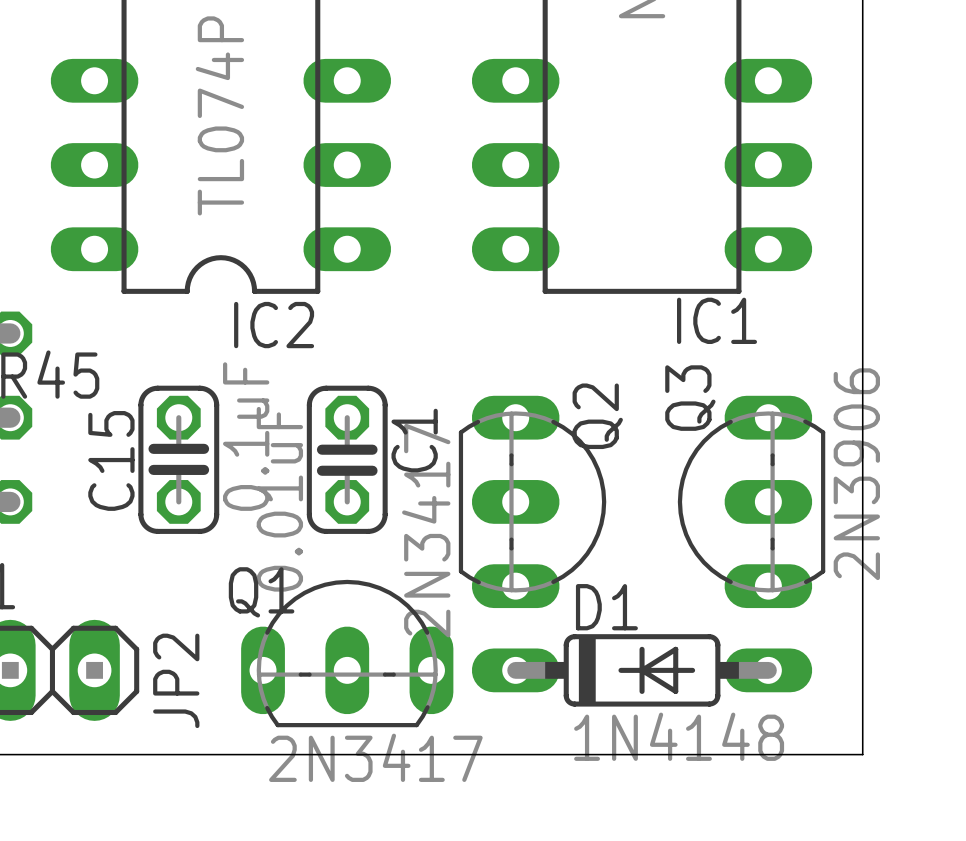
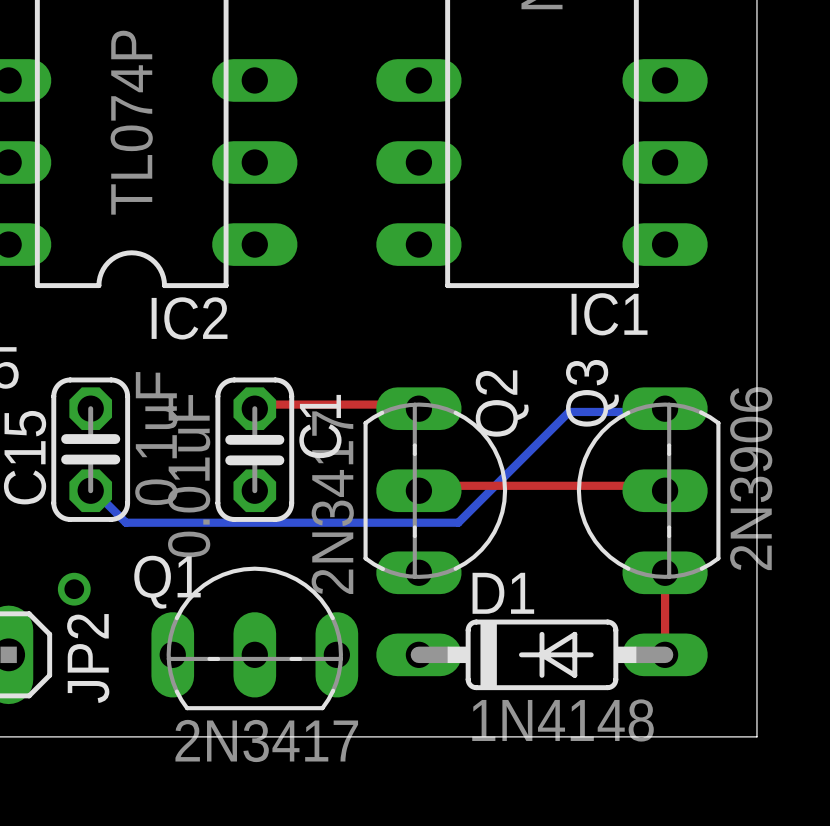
top track: none -> (254, 408) (258, 404) (413, 404) (418, 408)
bottom track: none -> (665, 408) (665, 411) (569, 411) (458, 522) (125, 522) (96, 493) (90, 490)
top track: none -> (418, 490) (421, 485) (665, 485) (665, 490)
top track: none -> (665, 572) (665, 654)
via: none -> (74, 589)

